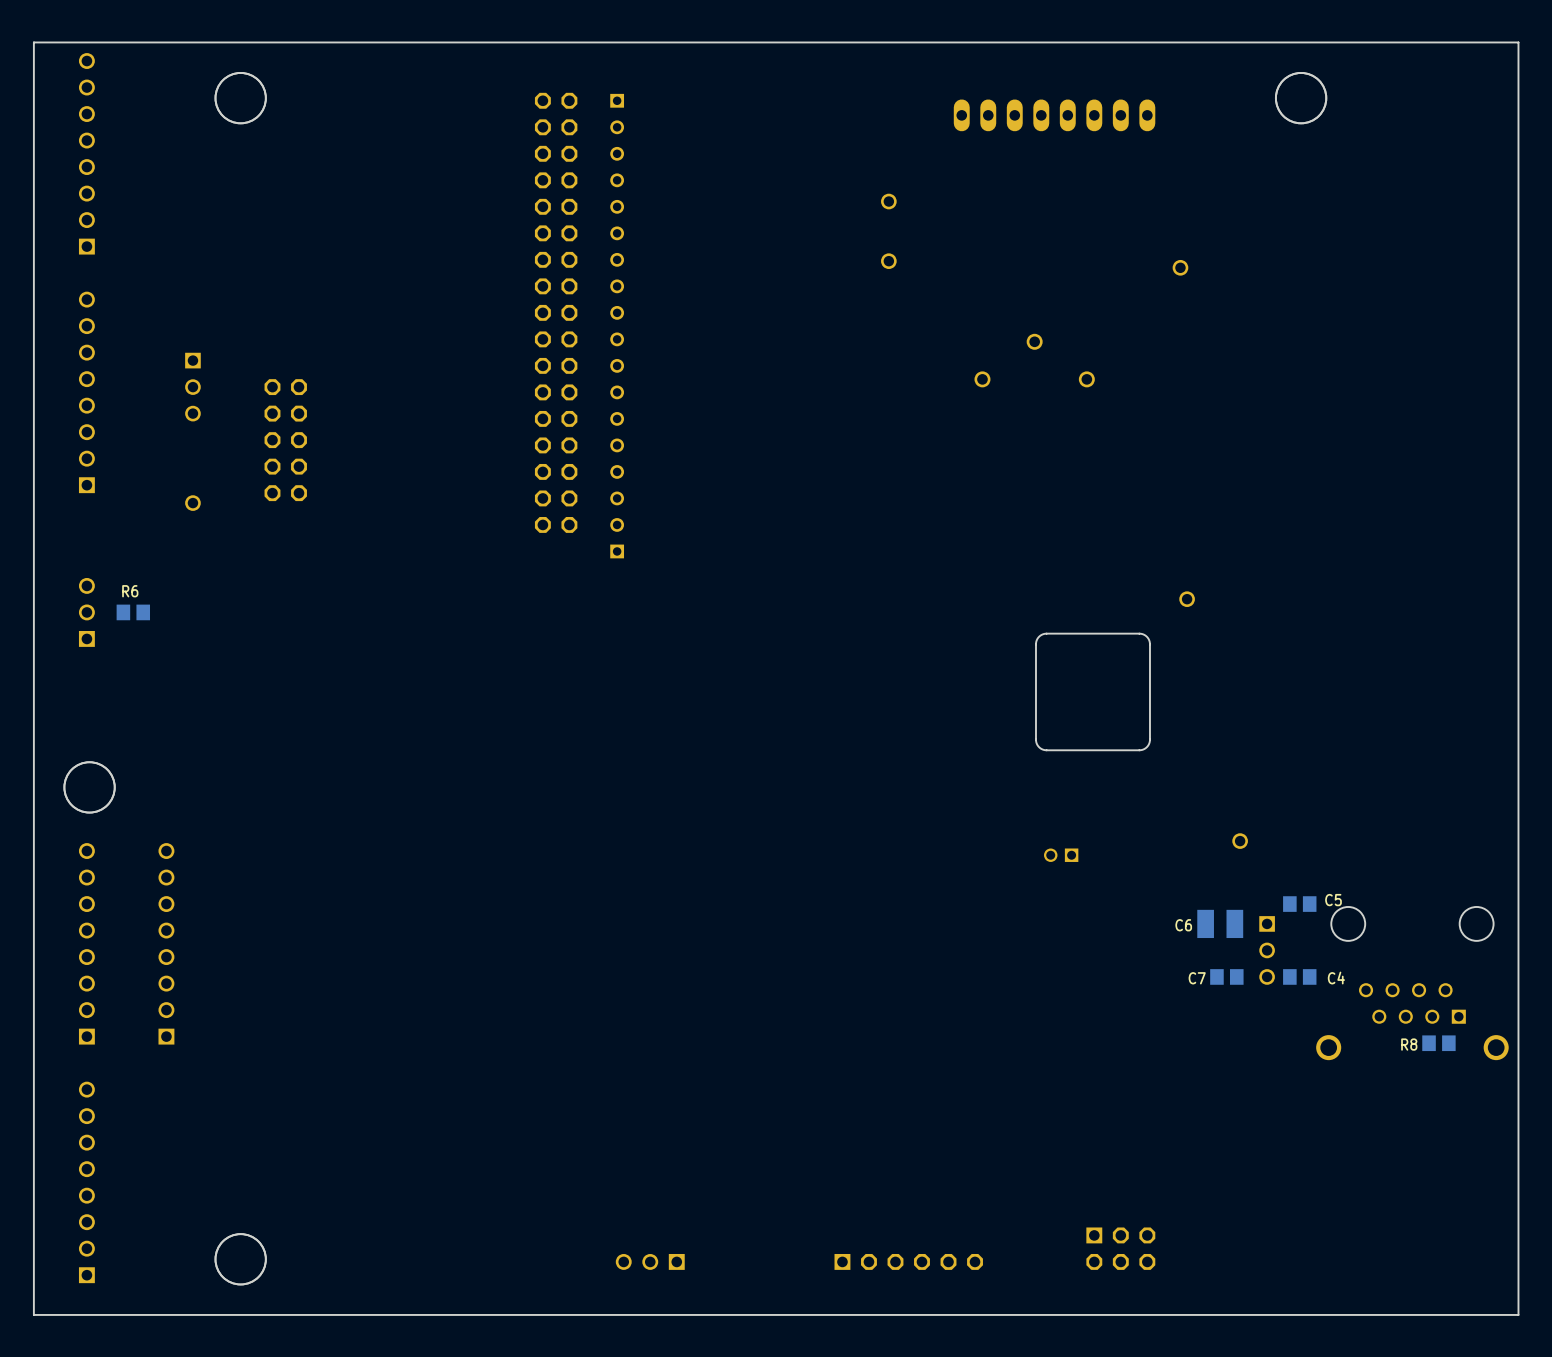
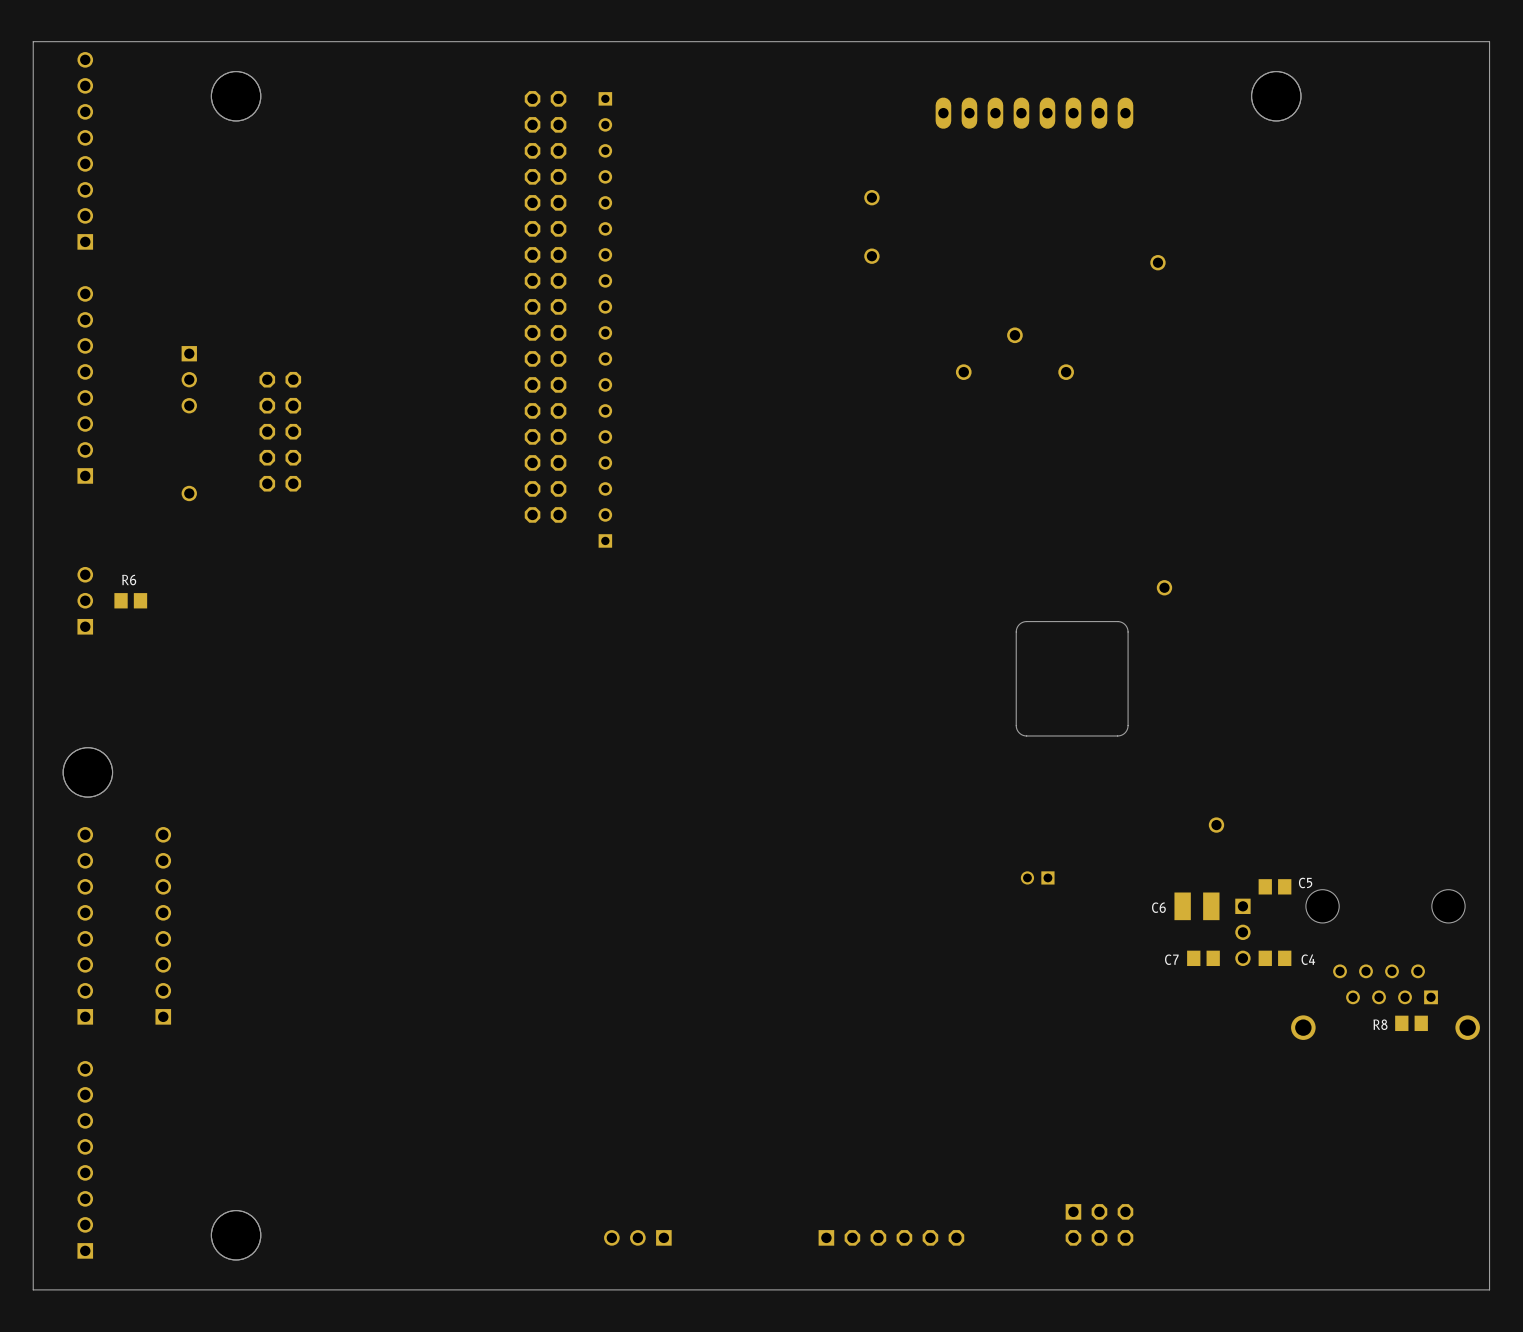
part position: (1061, 855) -> (1037, 877)

